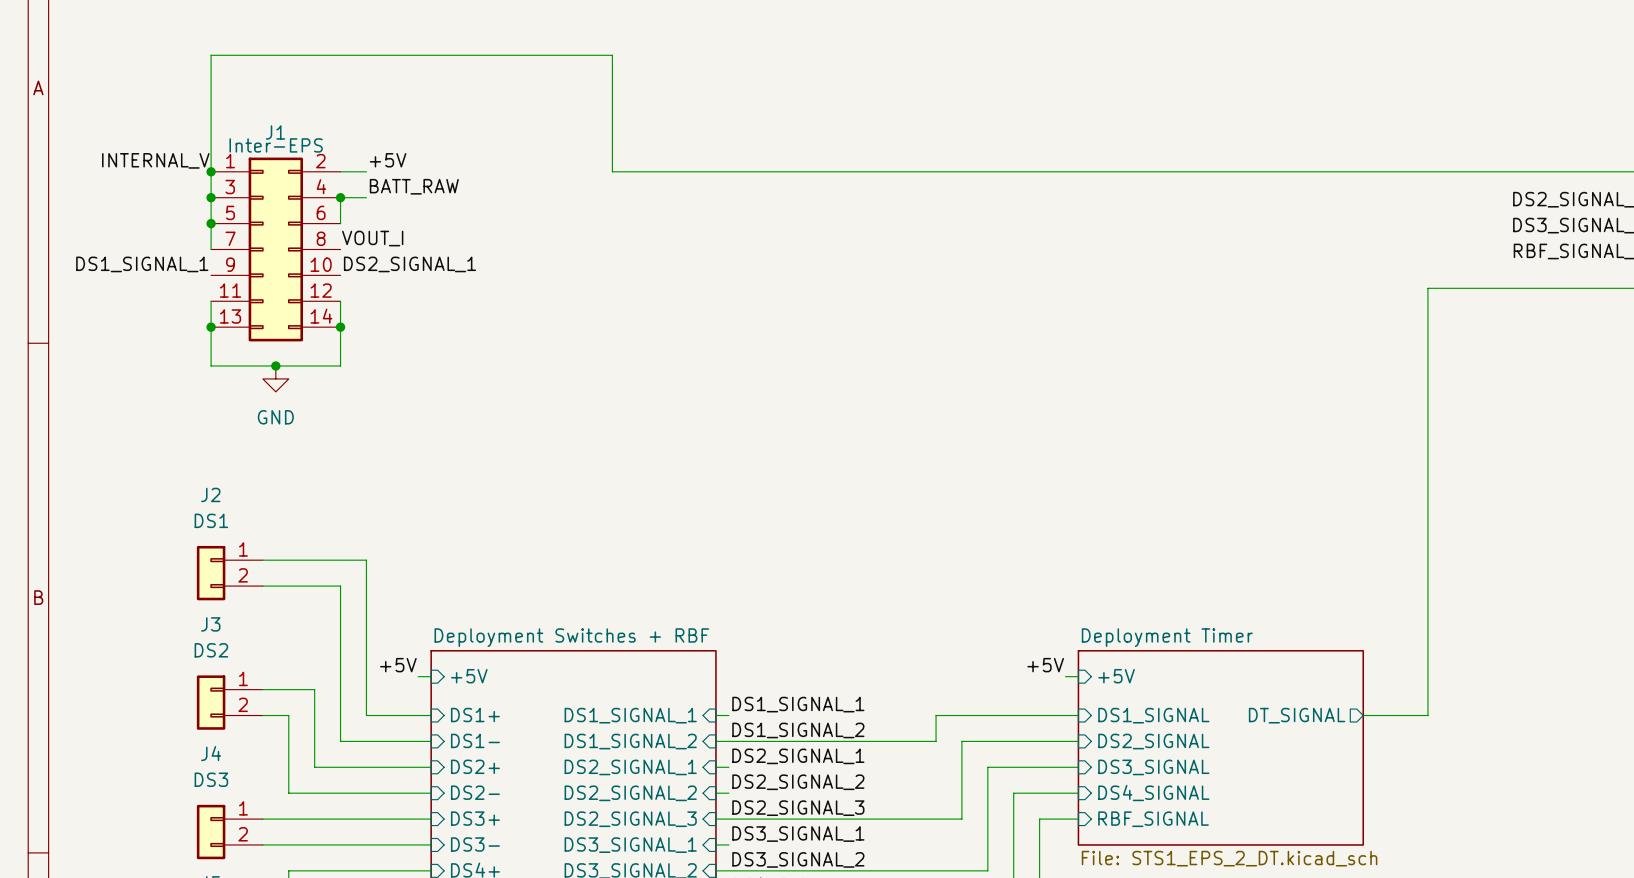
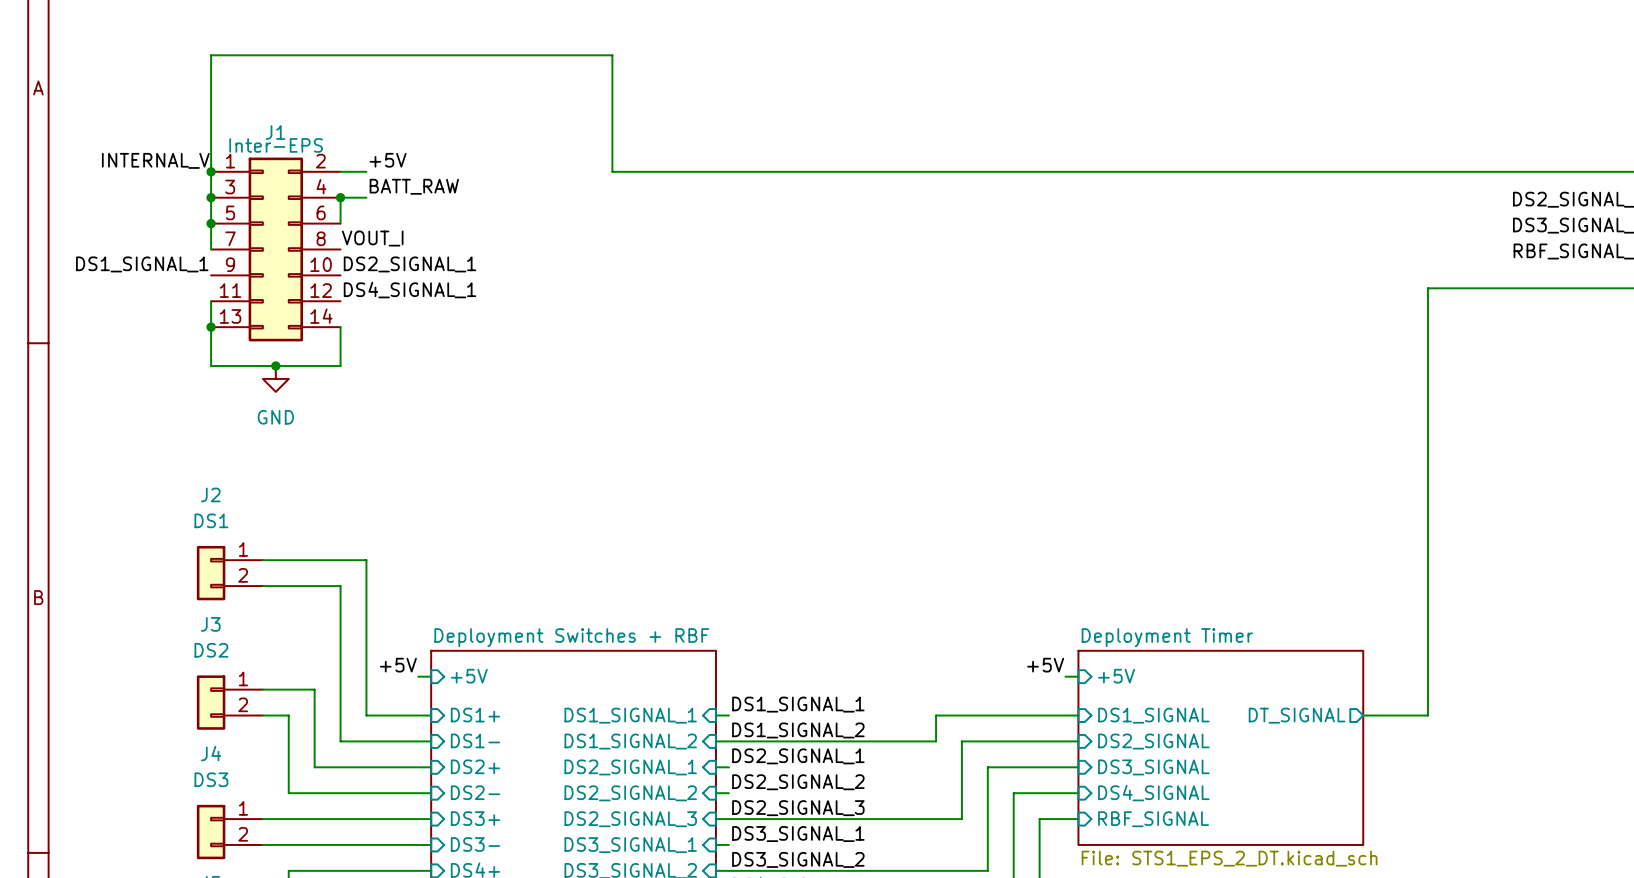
label: none -> DS4_SIGNAL_1 (409, 290)
wire: (340, 301) (340, 327) -> none
junction: (340, 327) -> none

